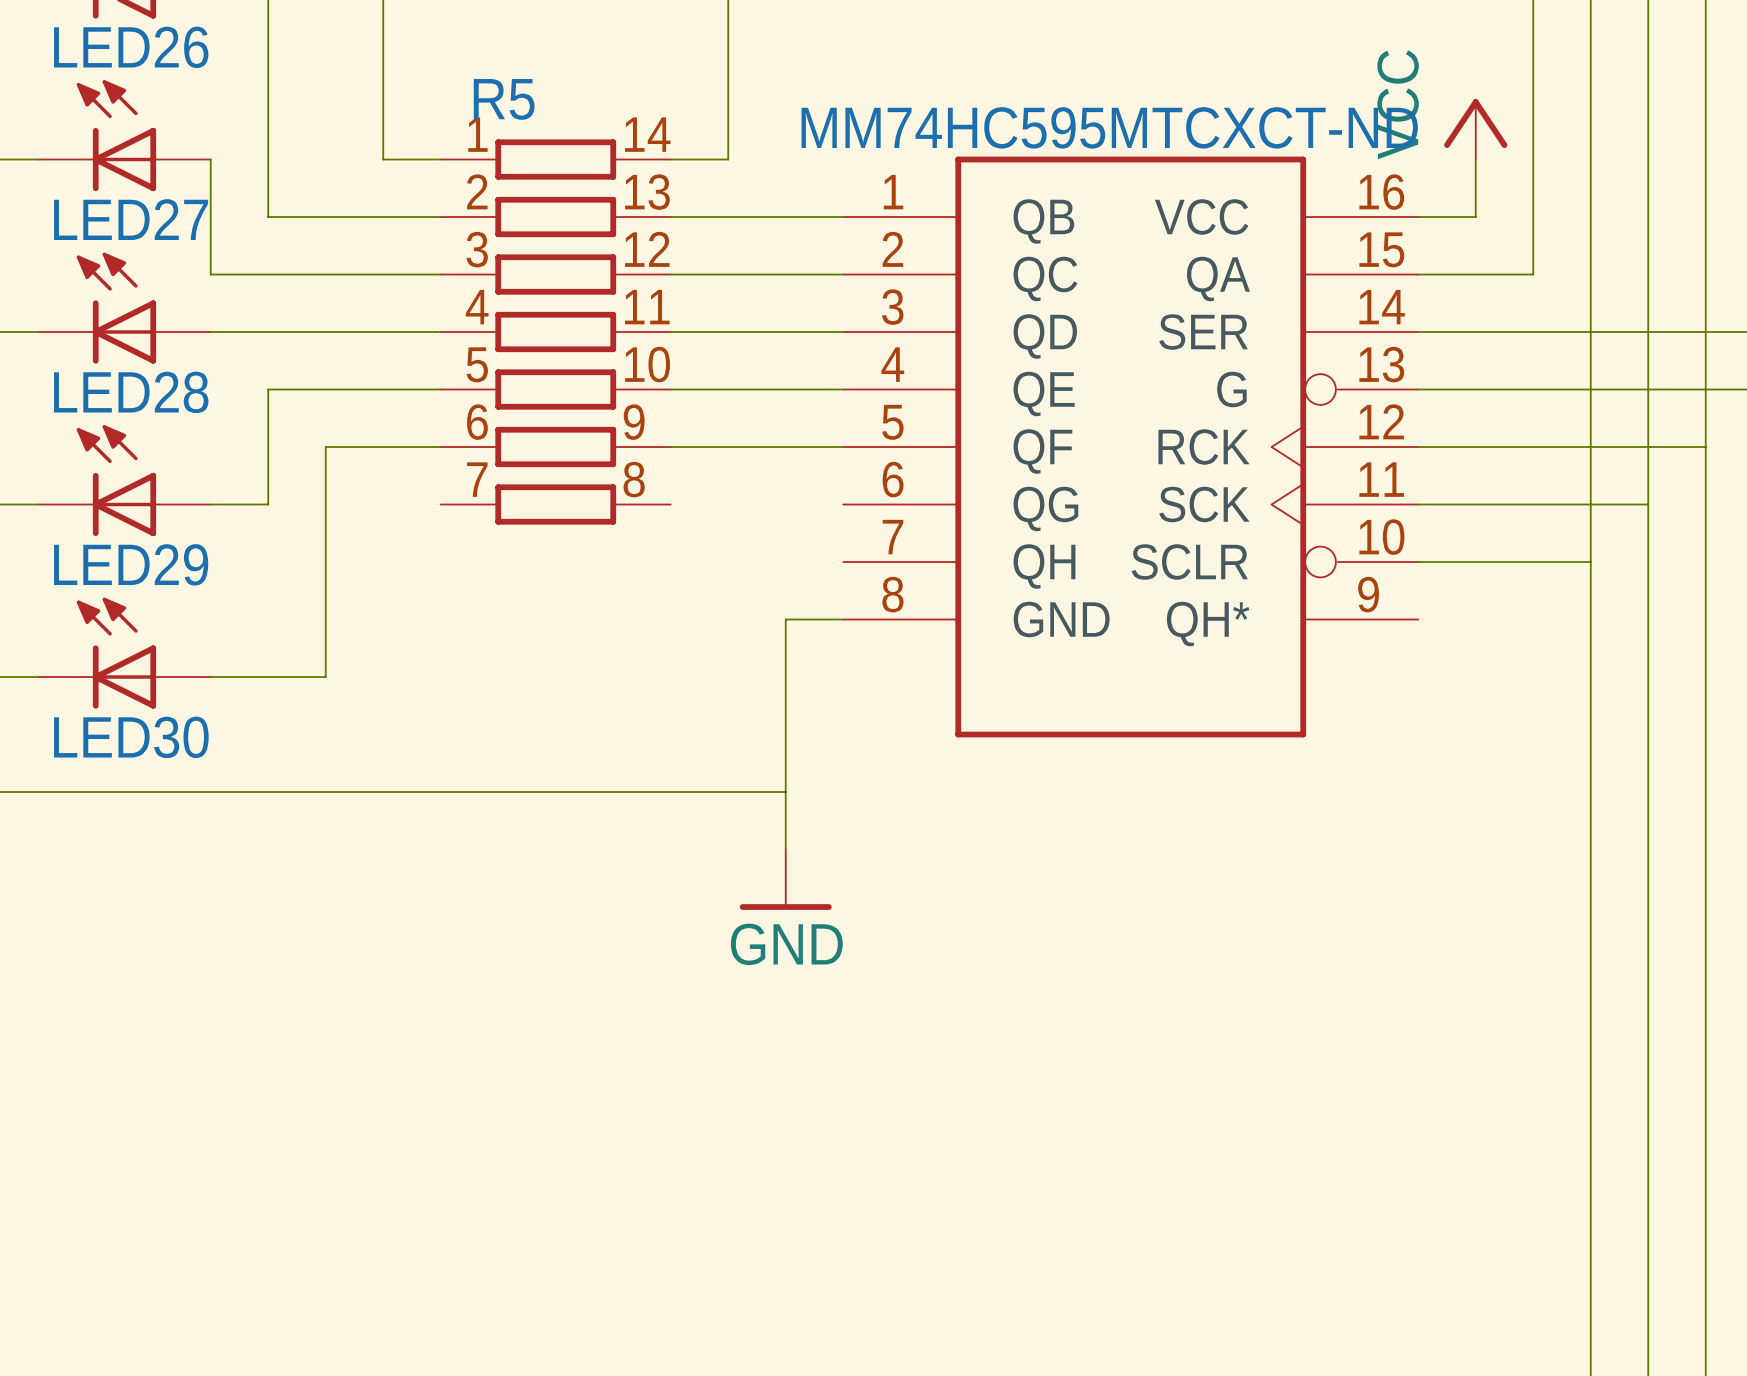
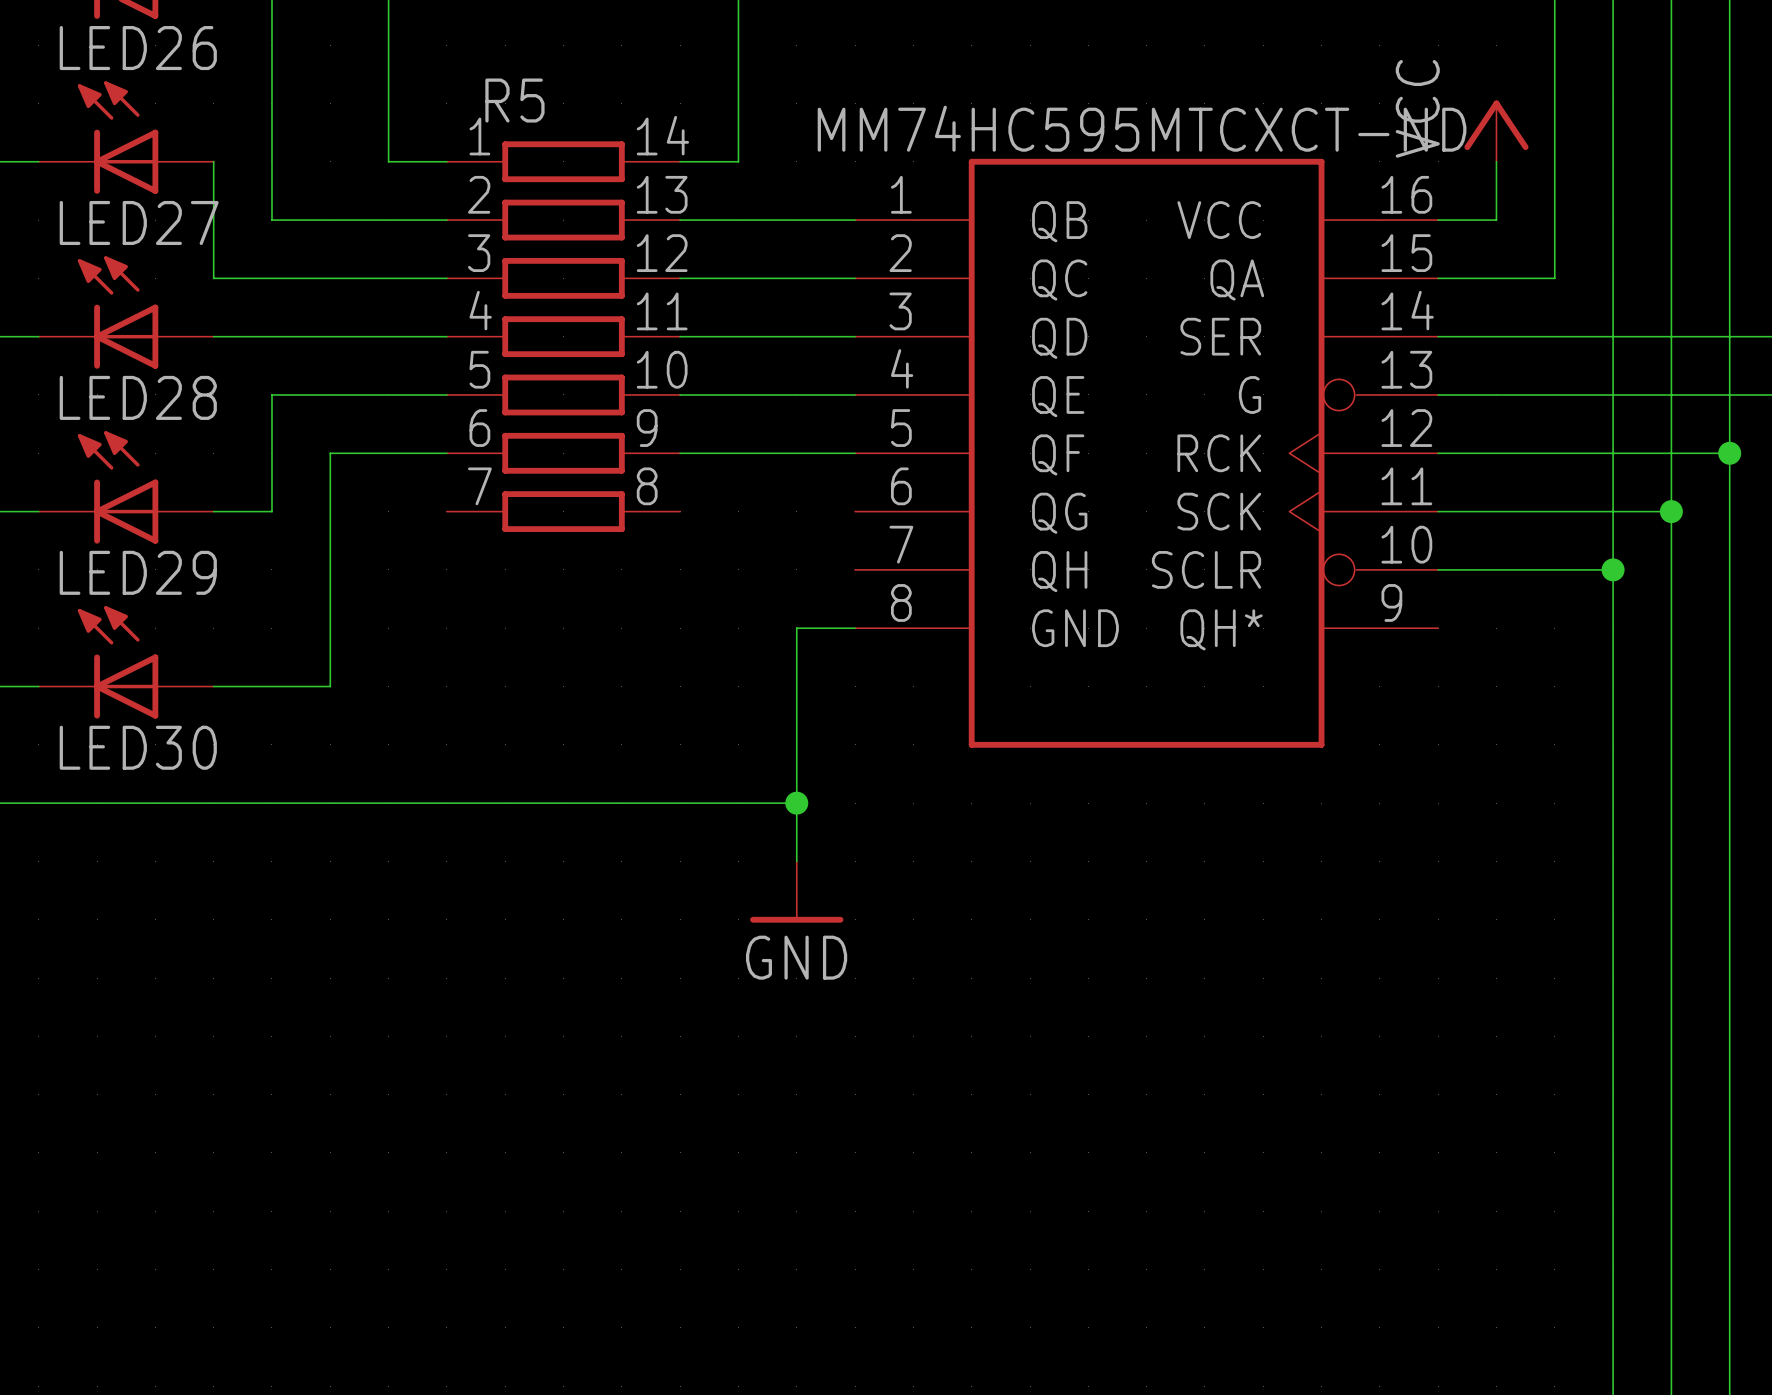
junction: none -> (1729, 453)
junction: none -> (1671, 511)
junction: none -> (1613, 569)
junction: none -> (796, 803)

